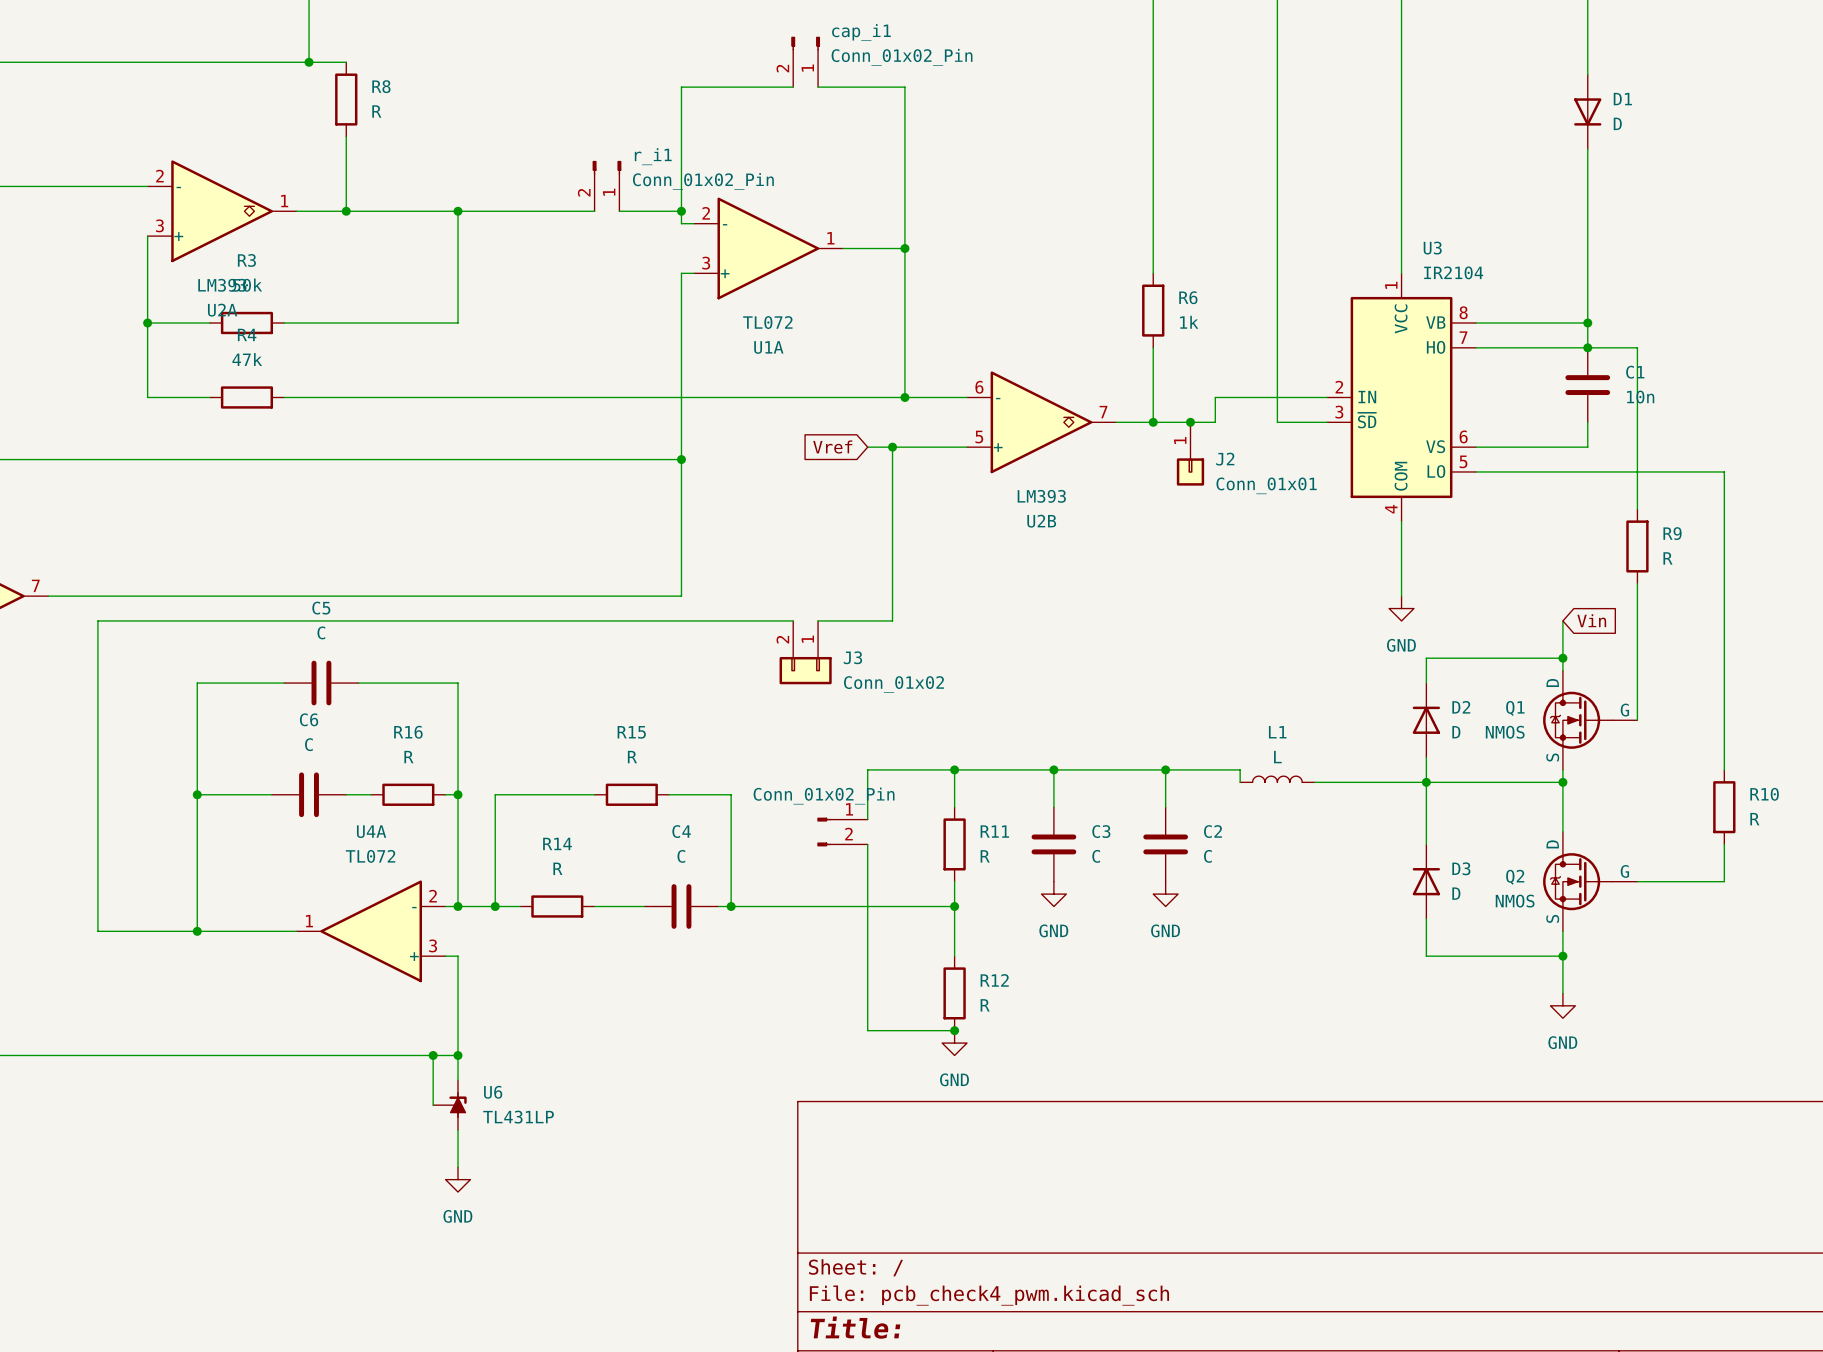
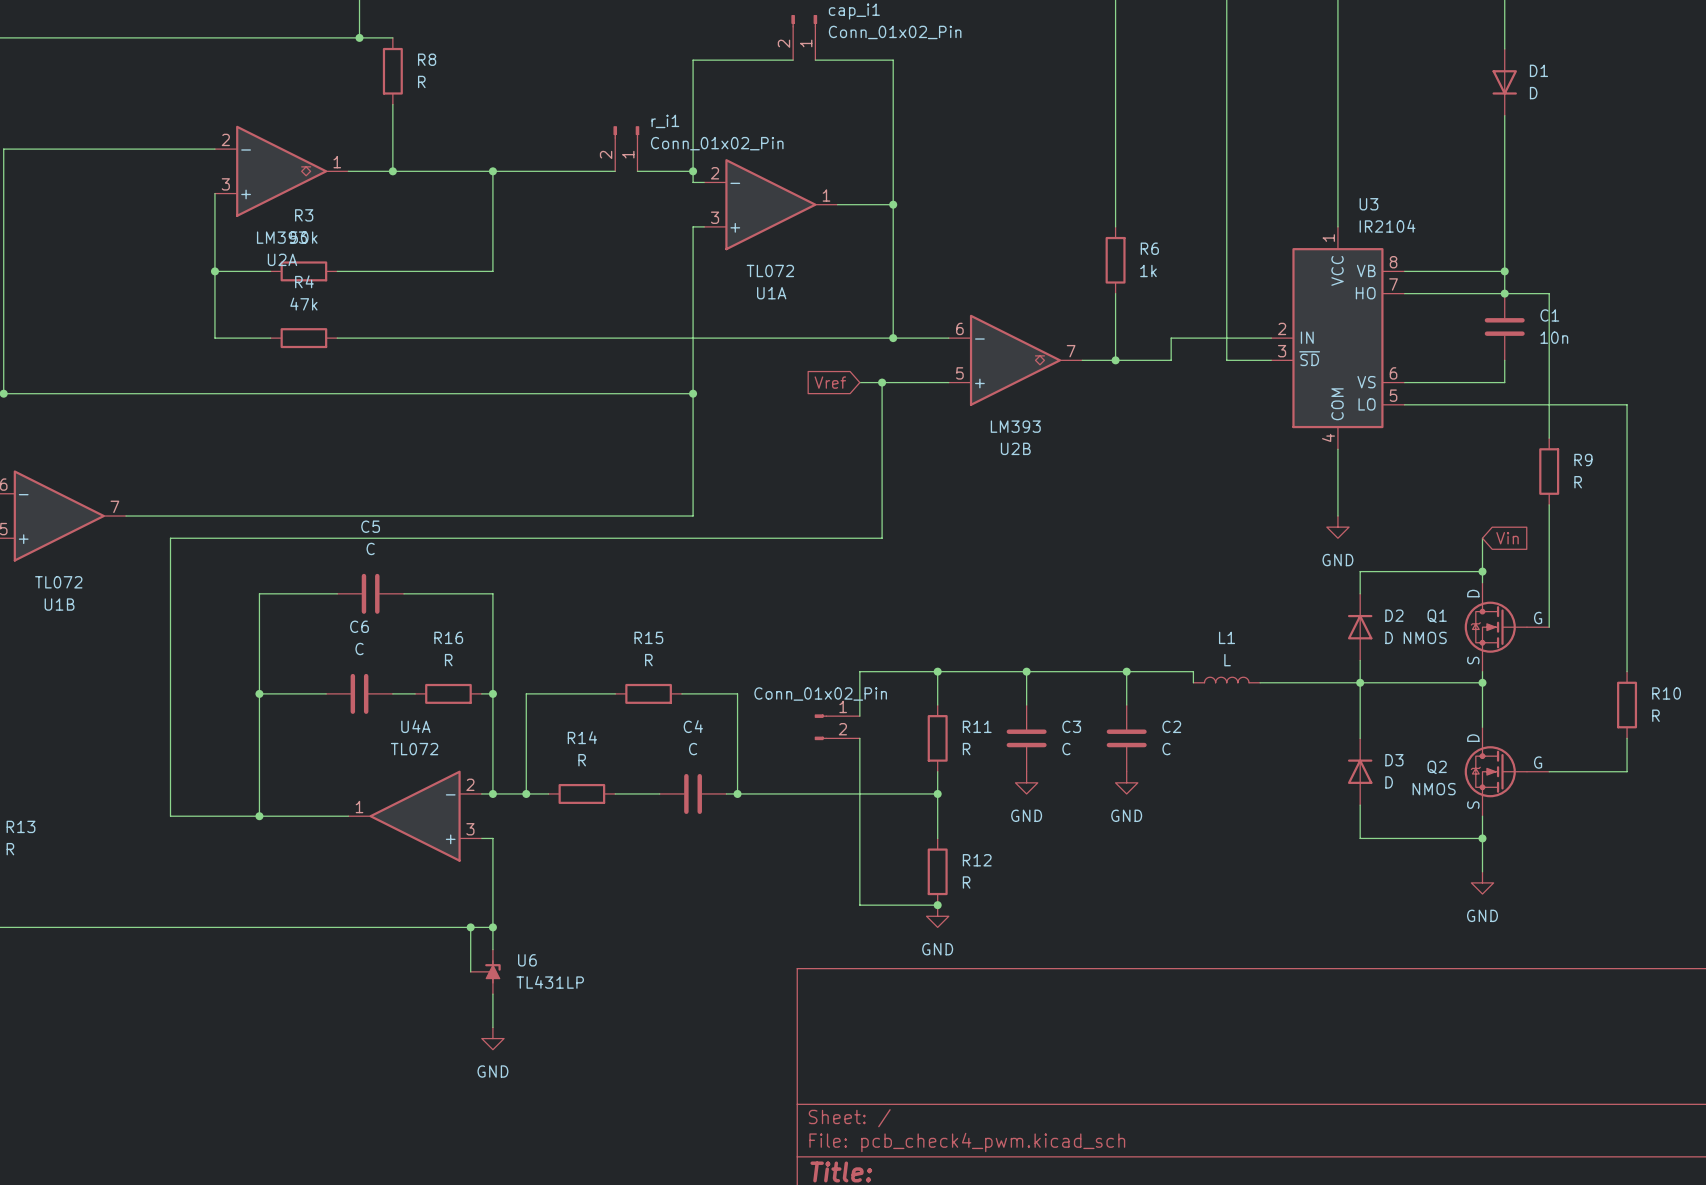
junction: (1190, 422) -> none
J2: Conn_01x01 (1190, 453) -> none
wire: none -> (793, 538) (815, 538)
J3: Conn_01x02 (805, 652) -> none

